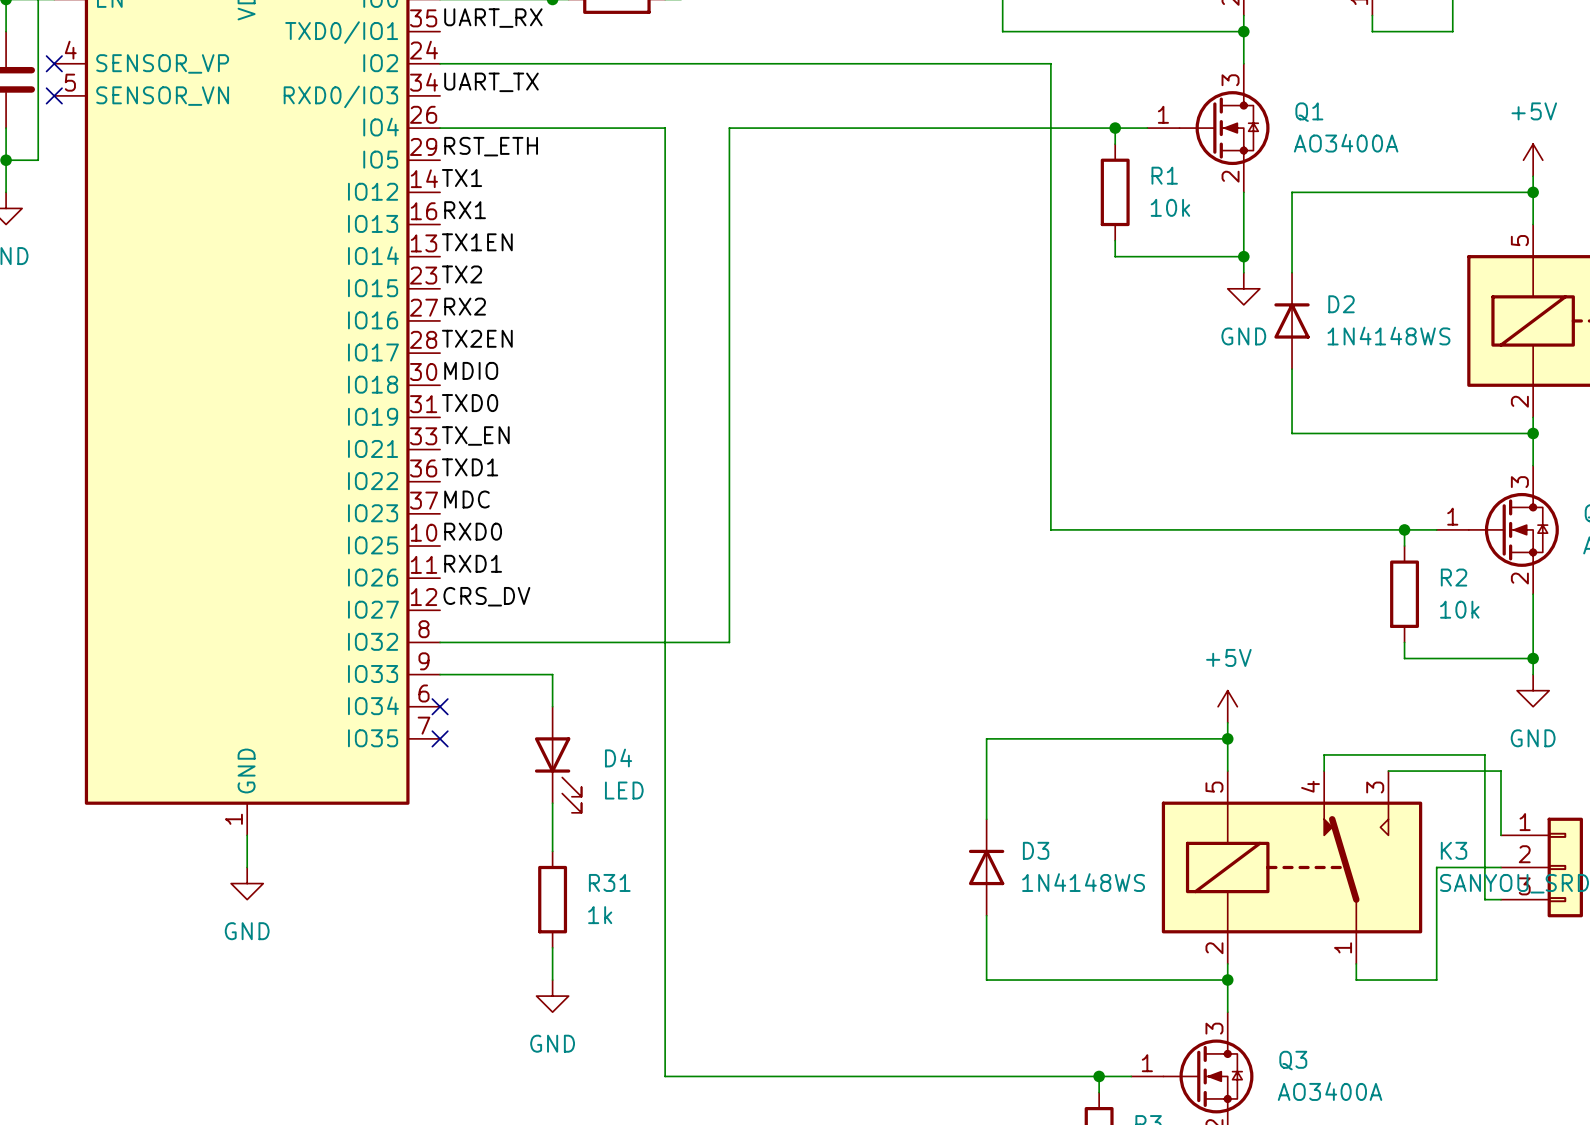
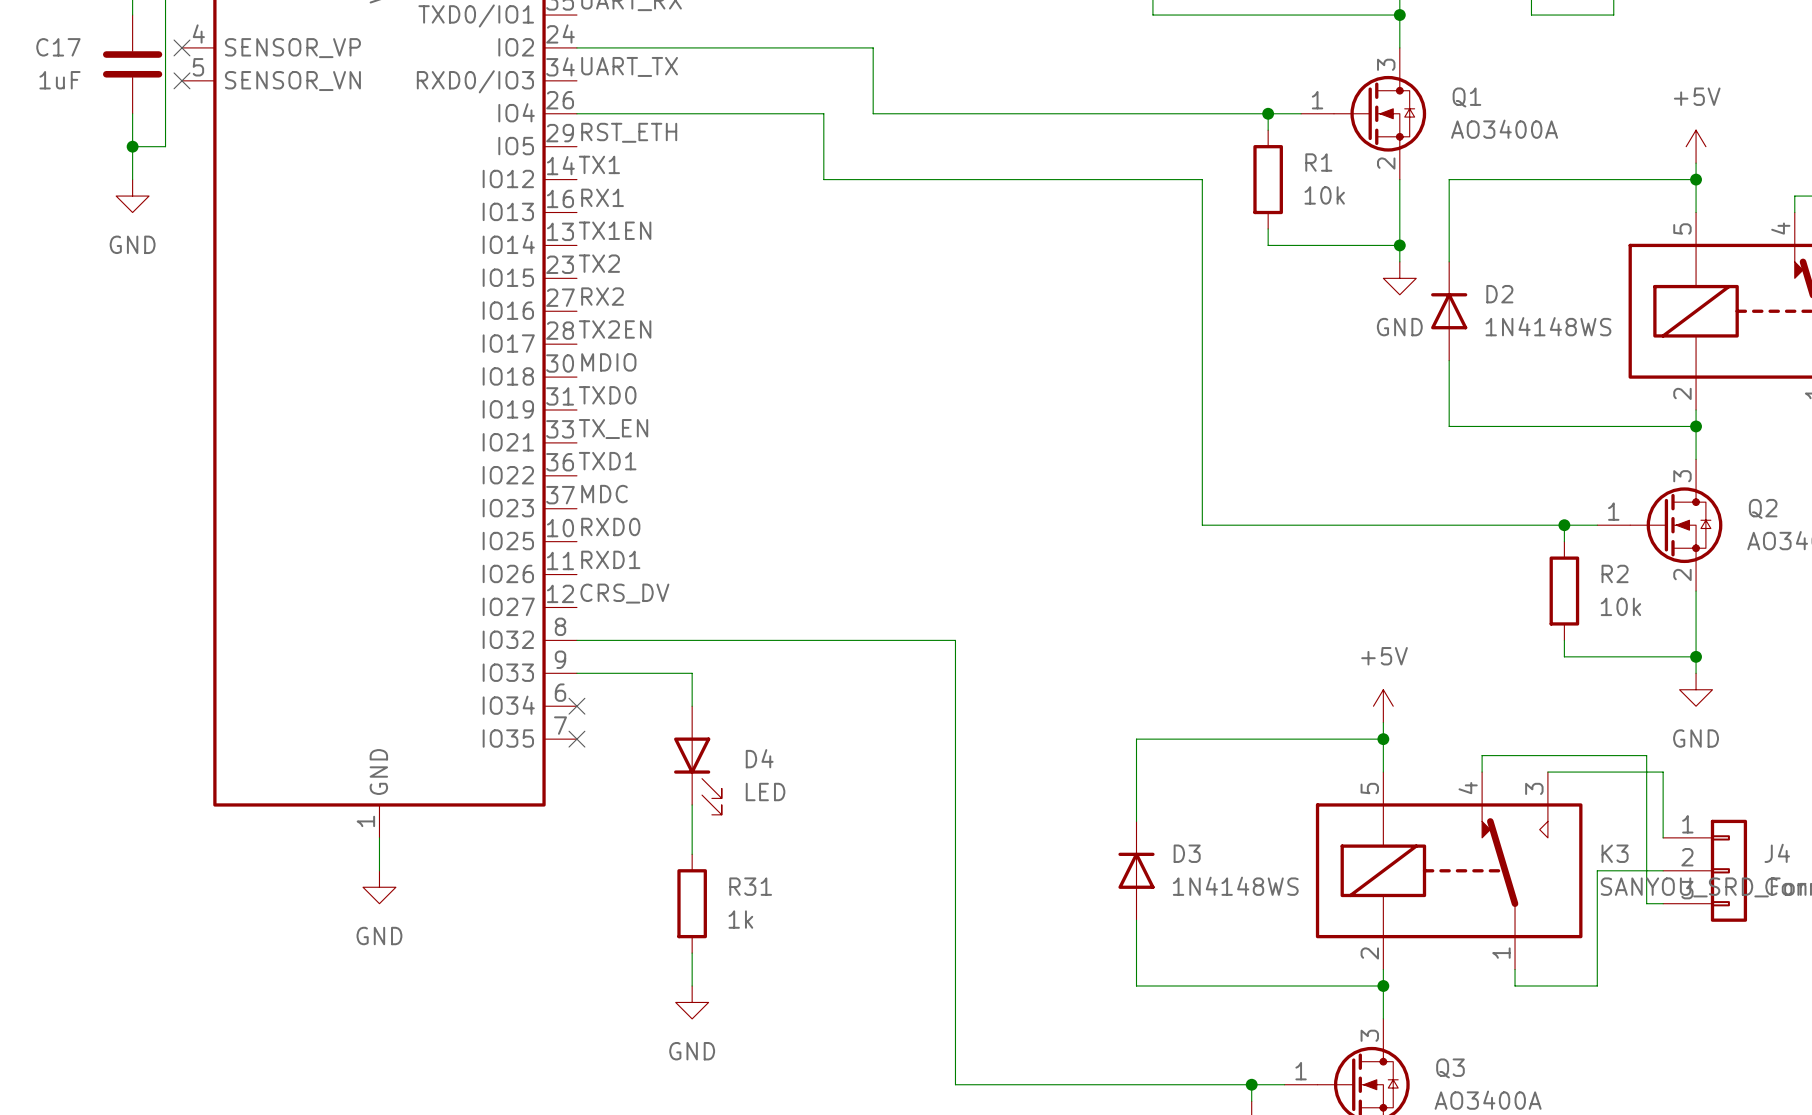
wire: (729, 63) (1050, 63) (1050, 192) -> (807, 113) (823, 113) (823, 179) (1202, 179)
wire: (665, 128) (665, 1076) (809, 1076) -> (873, 640) (955, 640) (955, 1084)
wire: (729, 128) (729, 642) -> (873, 113) (873, 47)

